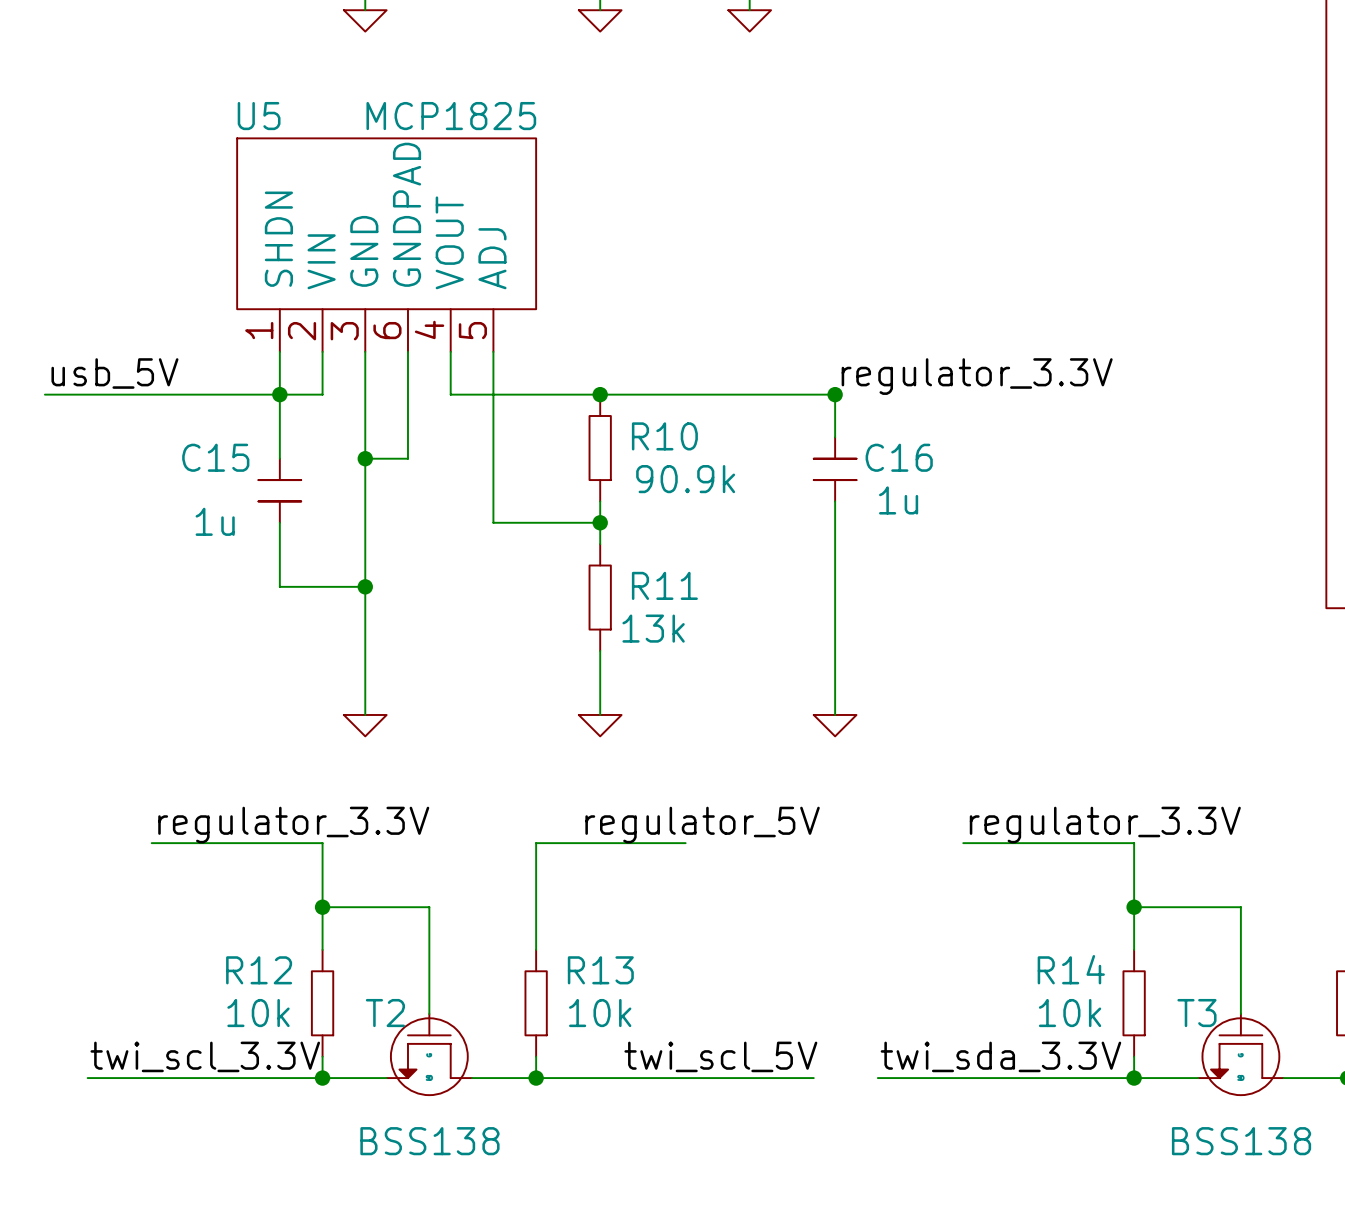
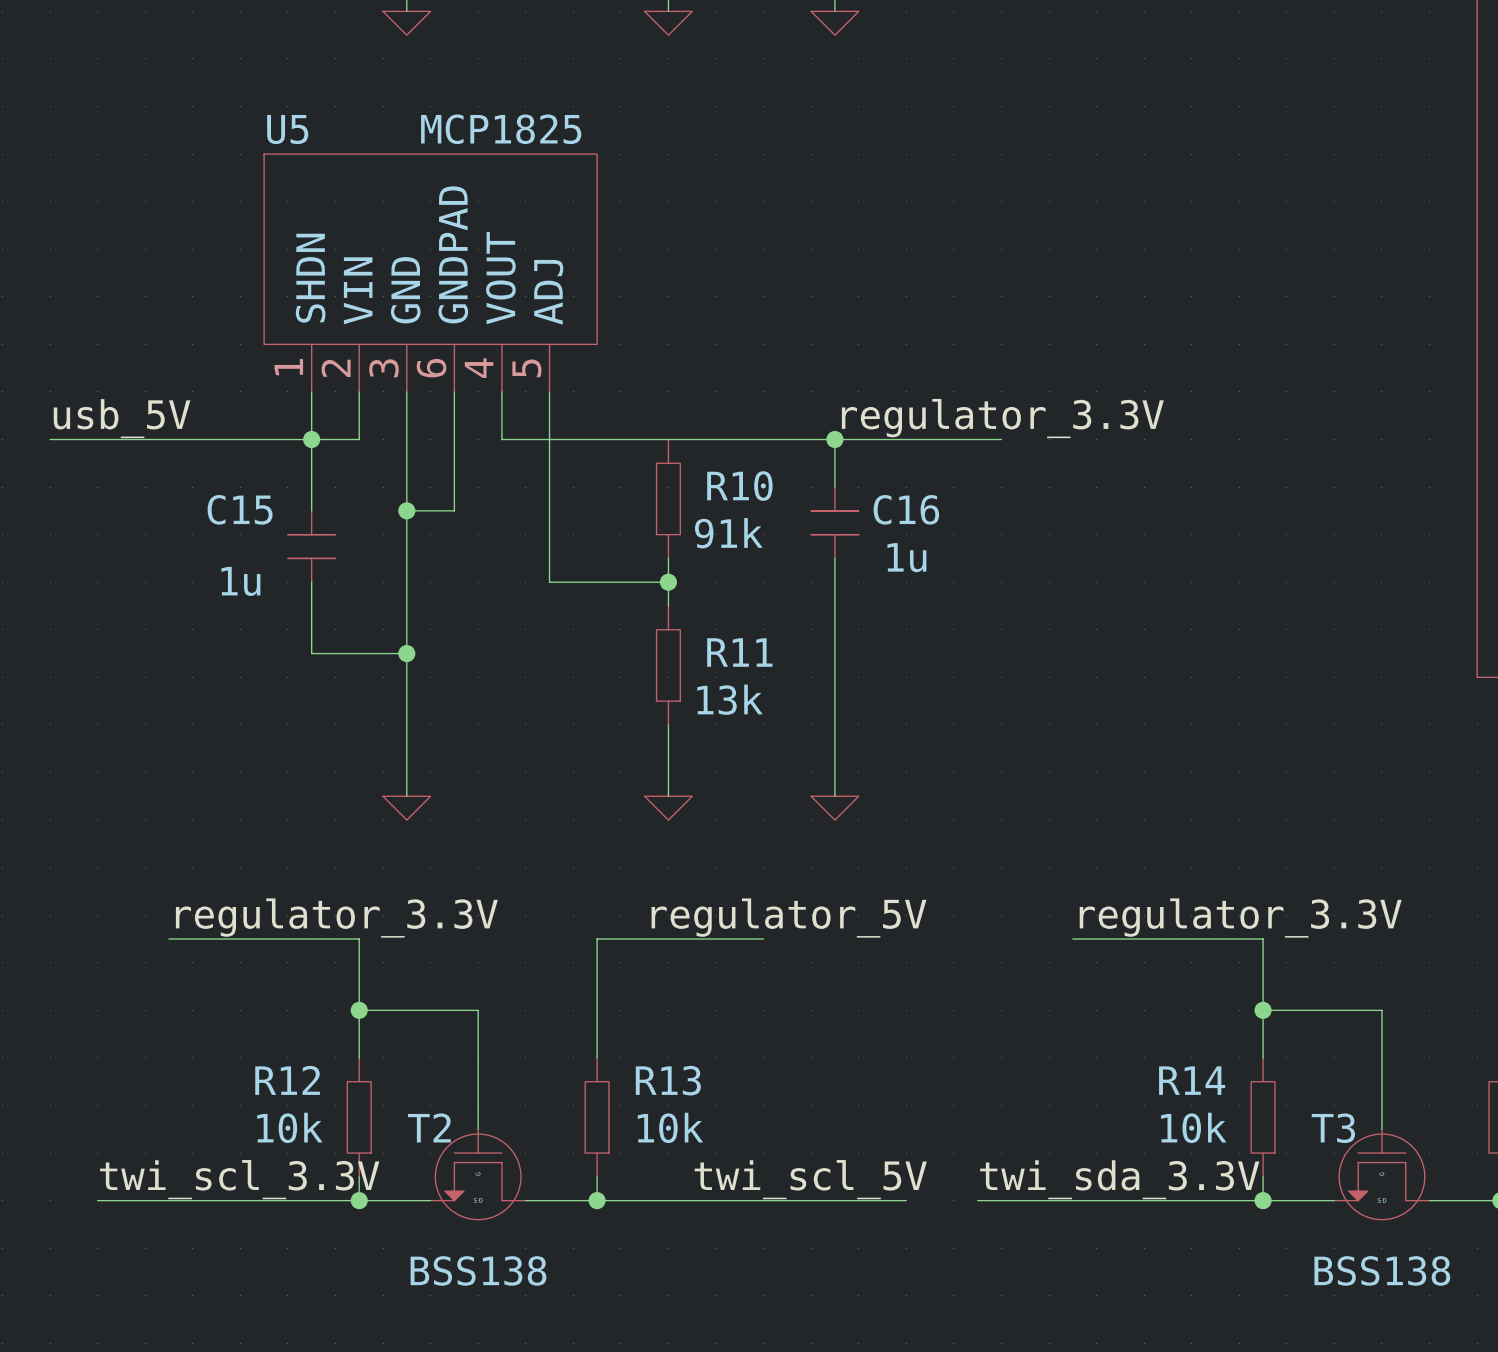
label position: regulator_3.3V (977, 376) -> regulator_3.3V (1002, 418)
junction: (600, 394) -> none
wire: none -> (834, 439) (834, 487)
junction: none -> (834, 439)
wire: (835, 394) (835, 437) -> (930, 439) (1001, 439)
junction: (835, 394) -> none
C16 position: (835, 469) -> (834, 522)
R10 text: 90.9k (685, 479) -> 91k (728, 533)
wire: (835, 501) (835, 714) -> (834, 558) (834, 796)
power symbol position: (835, 725) -> (834, 808)

